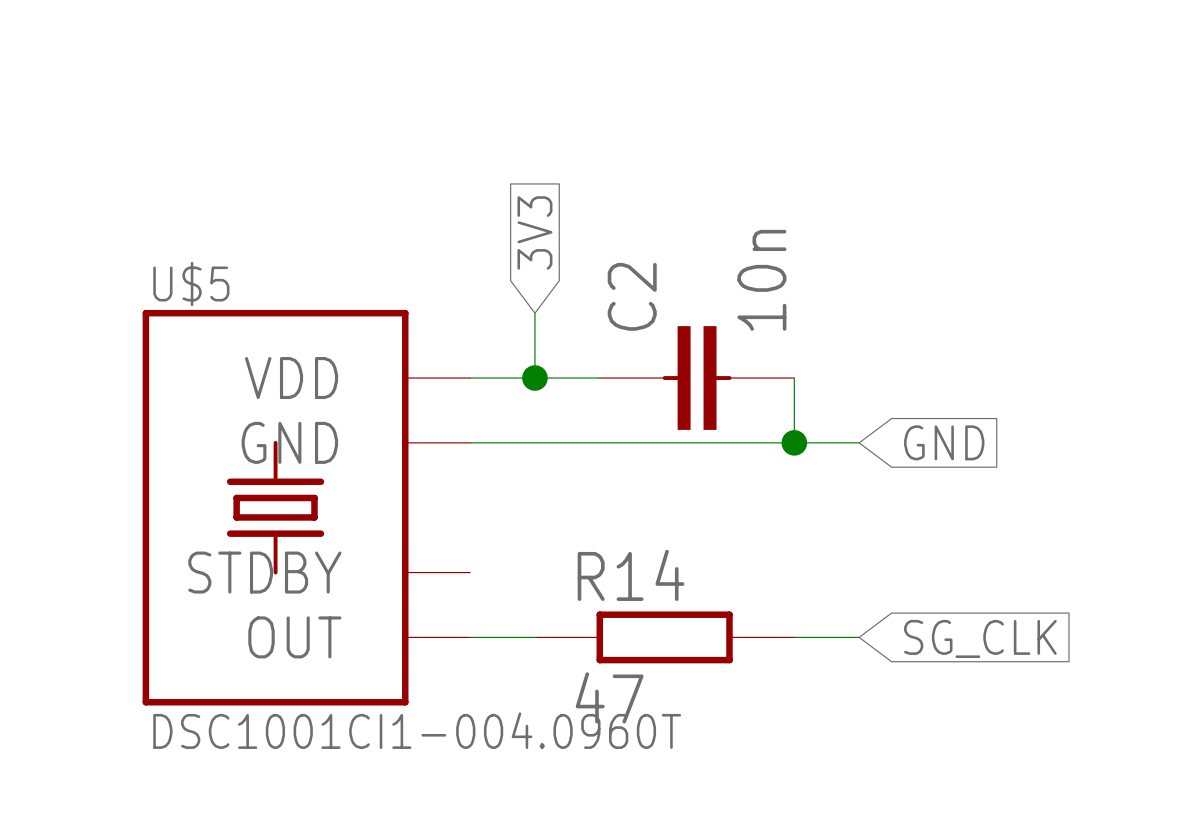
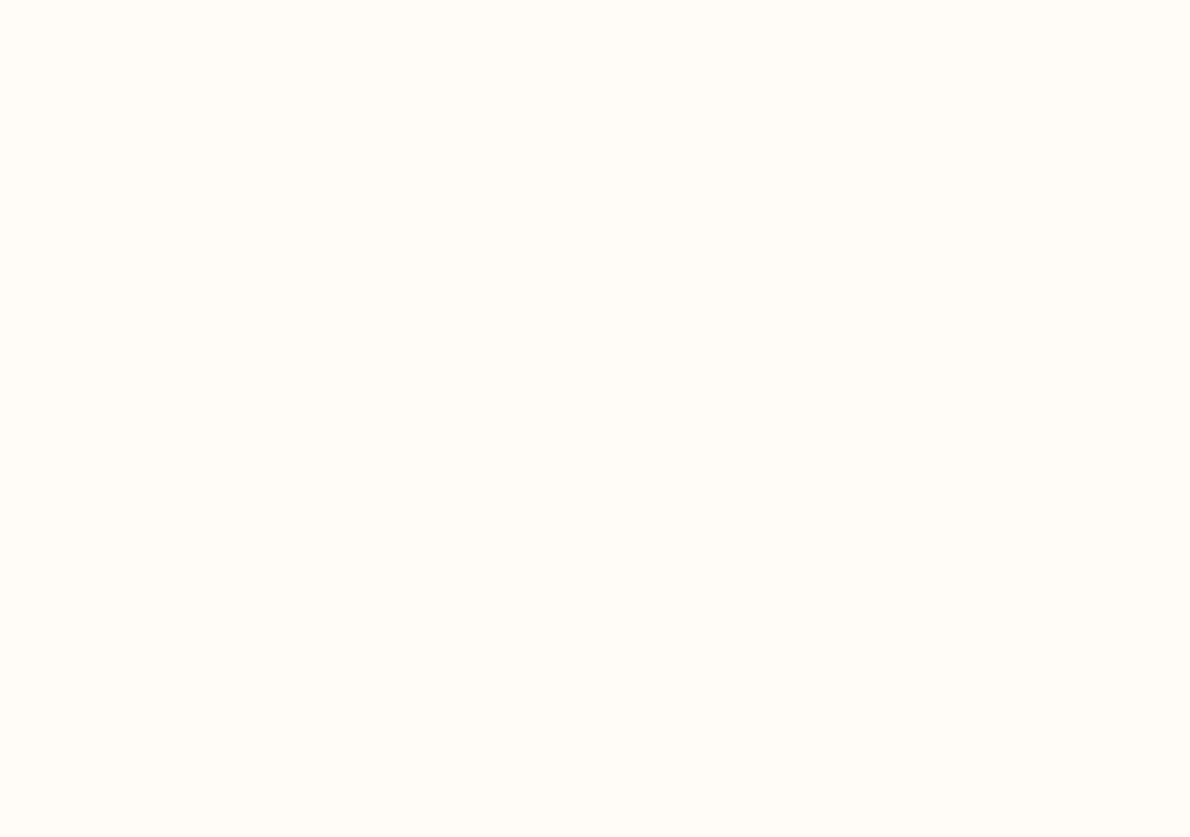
global label: 3V3 (534, 232) -> none
wire: (534, 313) (534, 378) -> none
wire: (470, 378) (599, 378) -> none
junction: (534, 378) -> none
C2: 10n (697, 378) -> none
wire: (794, 378) (794, 442) -> none
wire: (470, 442) (859, 442) -> none
junction: (794, 442) -> none
global label: GND (944, 442) -> none
U$5: DSC1001CI1-004.0960T (306, 507) -> none
wire: (470, 637) (534, 637) -> none
R14: 47 (664, 637) -> none
wire: (794, 637) (859, 637) -> none
global label: SG_CLK (980, 638) -> none

